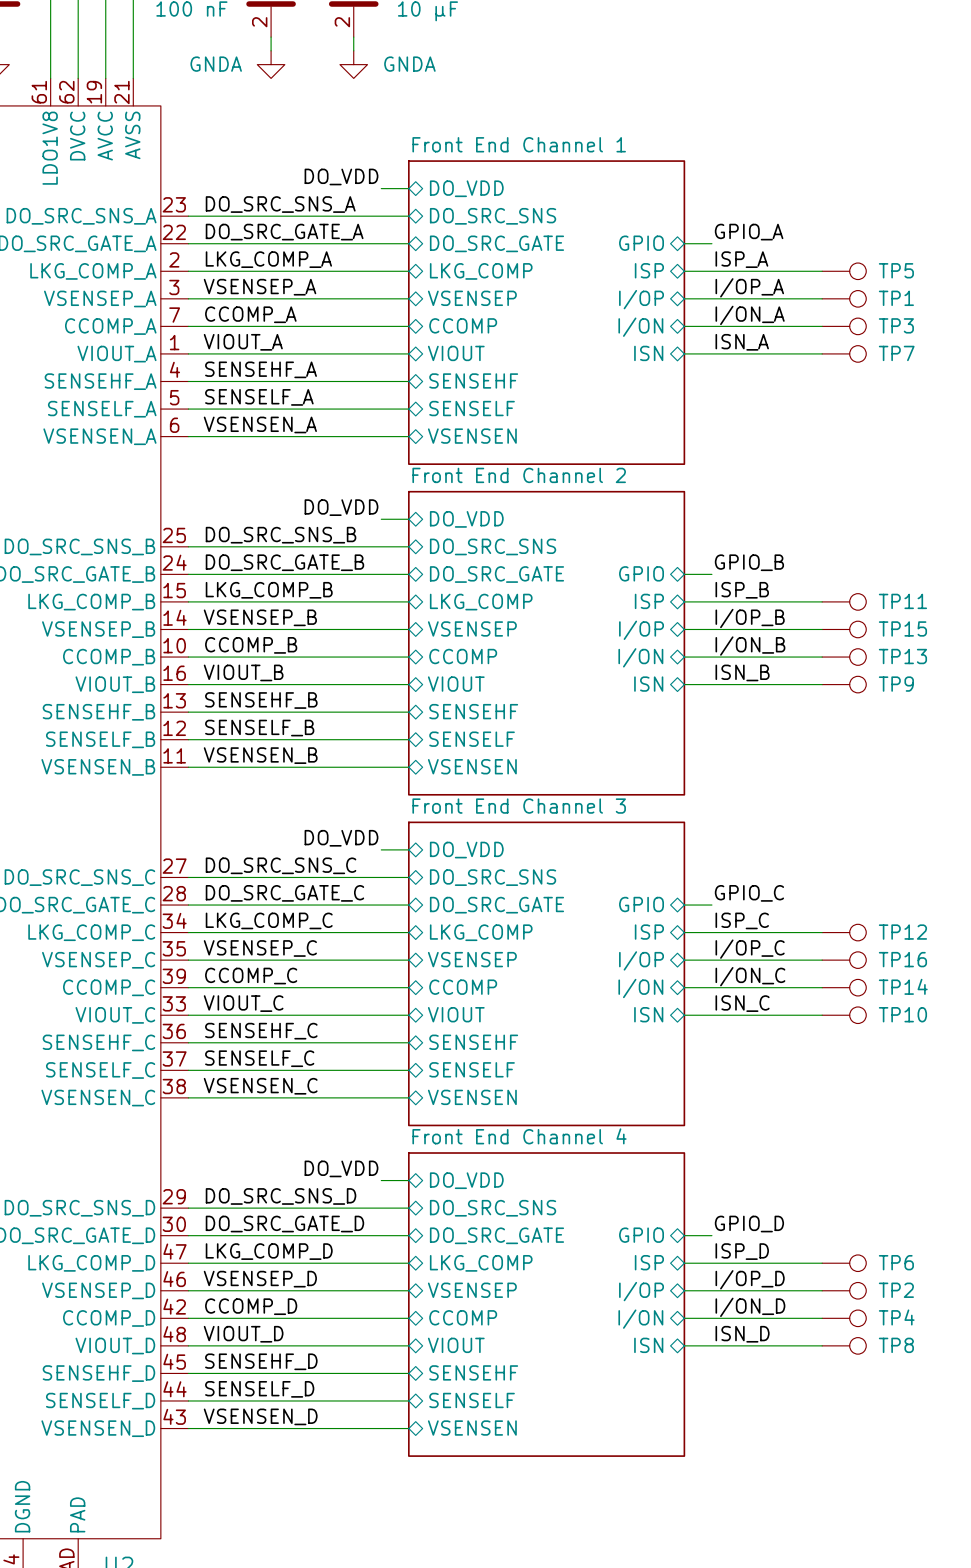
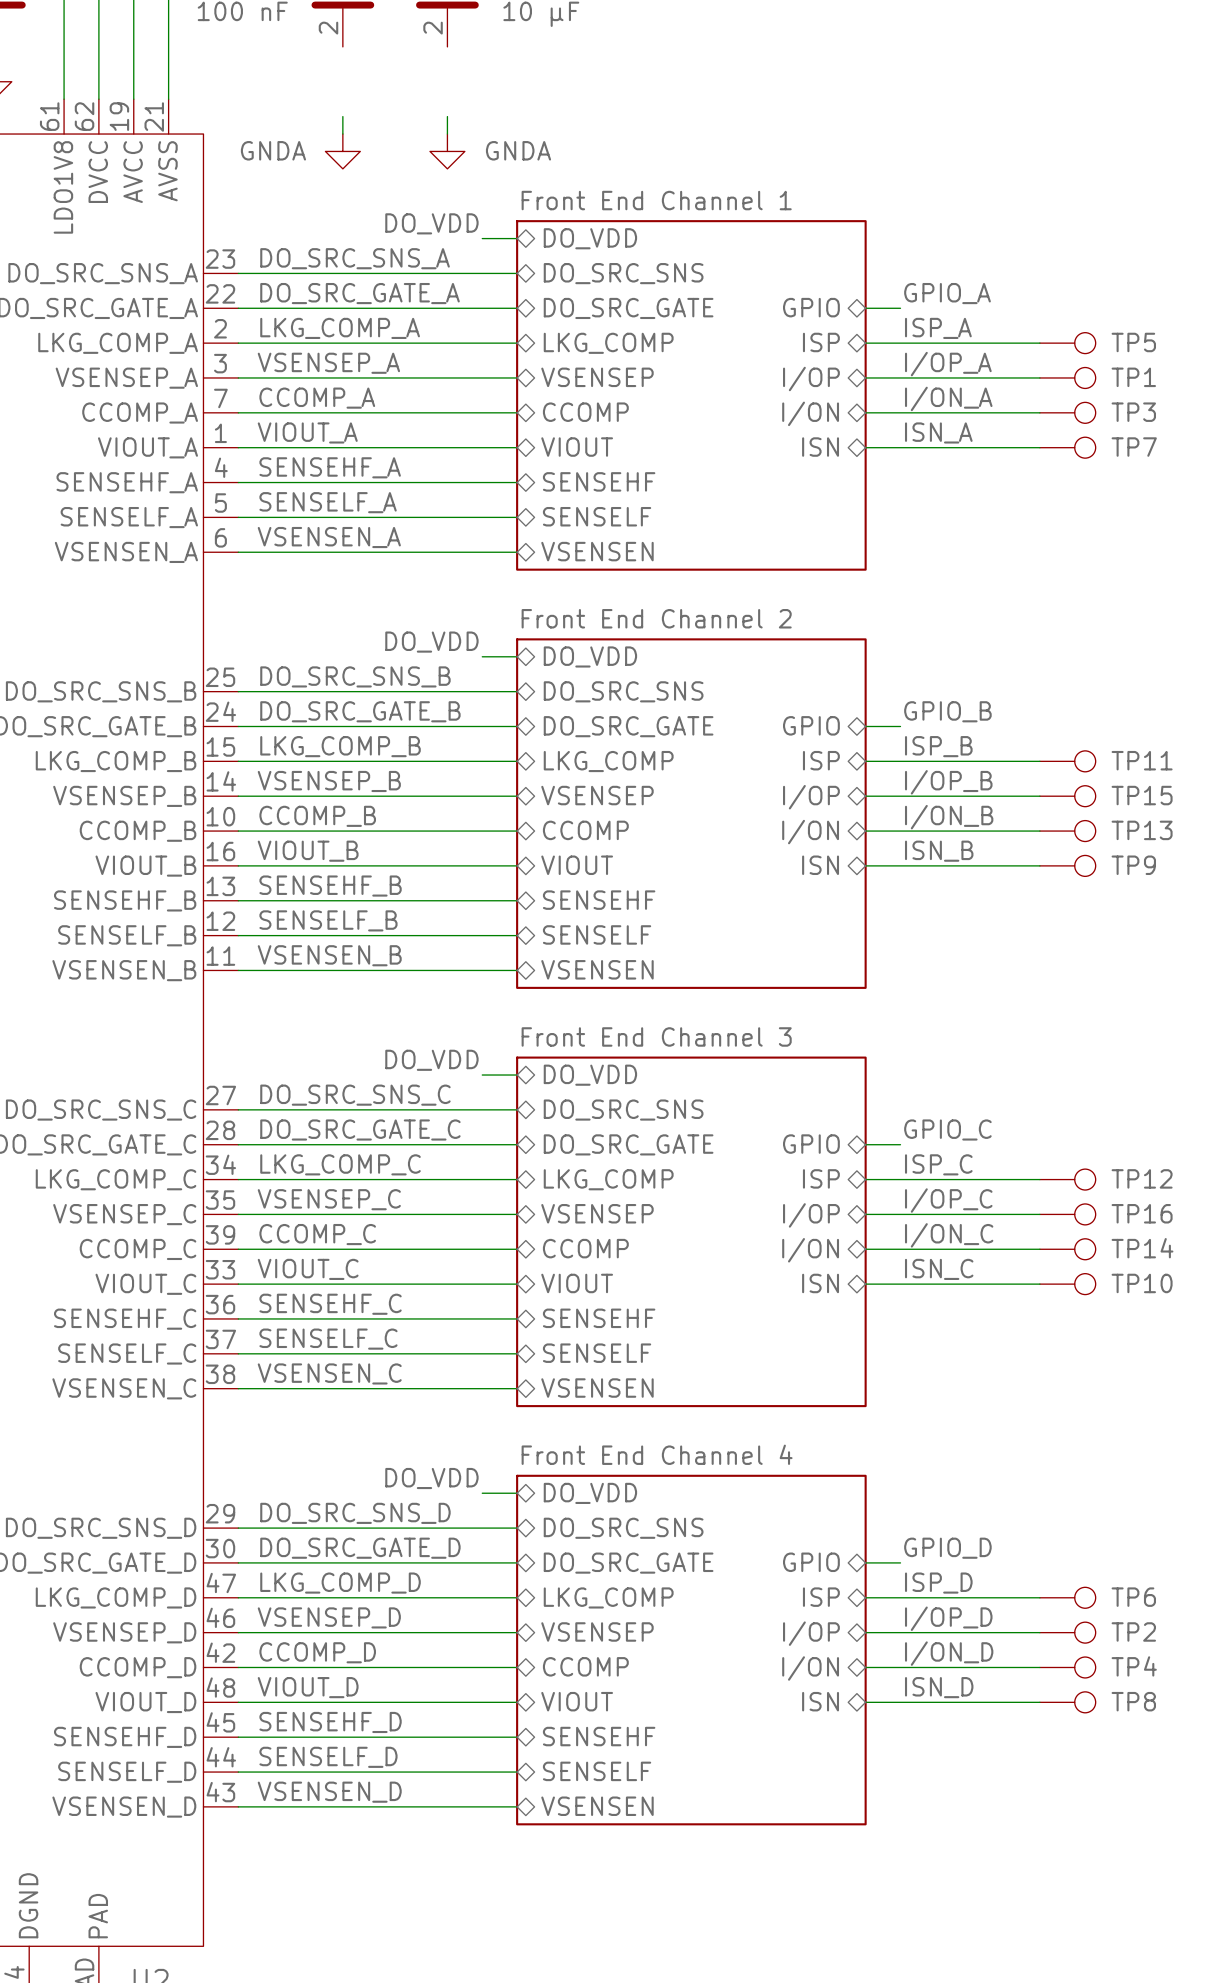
wire: (271, 37) (271, 50) -> (342, 116) (342, 134)
wire: (353, 37) (353, 50) -> (447, 116) (447, 134)
power symbol: GNDA (271, 64) -> none
power symbol: GNDA (353, 64) -> none
power symbol: none -> GNDA (342, 151)
power symbol: none -> GNDA (447, 151)
sheet Front End Channel 1 shape: [408, 160, 686, 465] -> [516, 220, 867, 571]
sheet Front End Channel 2 shape: [408, 490, 686, 796] -> [516, 638, 867, 989]
sheet Front End Channel 3 shape: [408, 821, 686, 1127] -> [516, 1056, 867, 1408]
sheet Front End Channel 4 shape: [408, 1152, 686, 1457] -> [516, 1474, 867, 1826]

